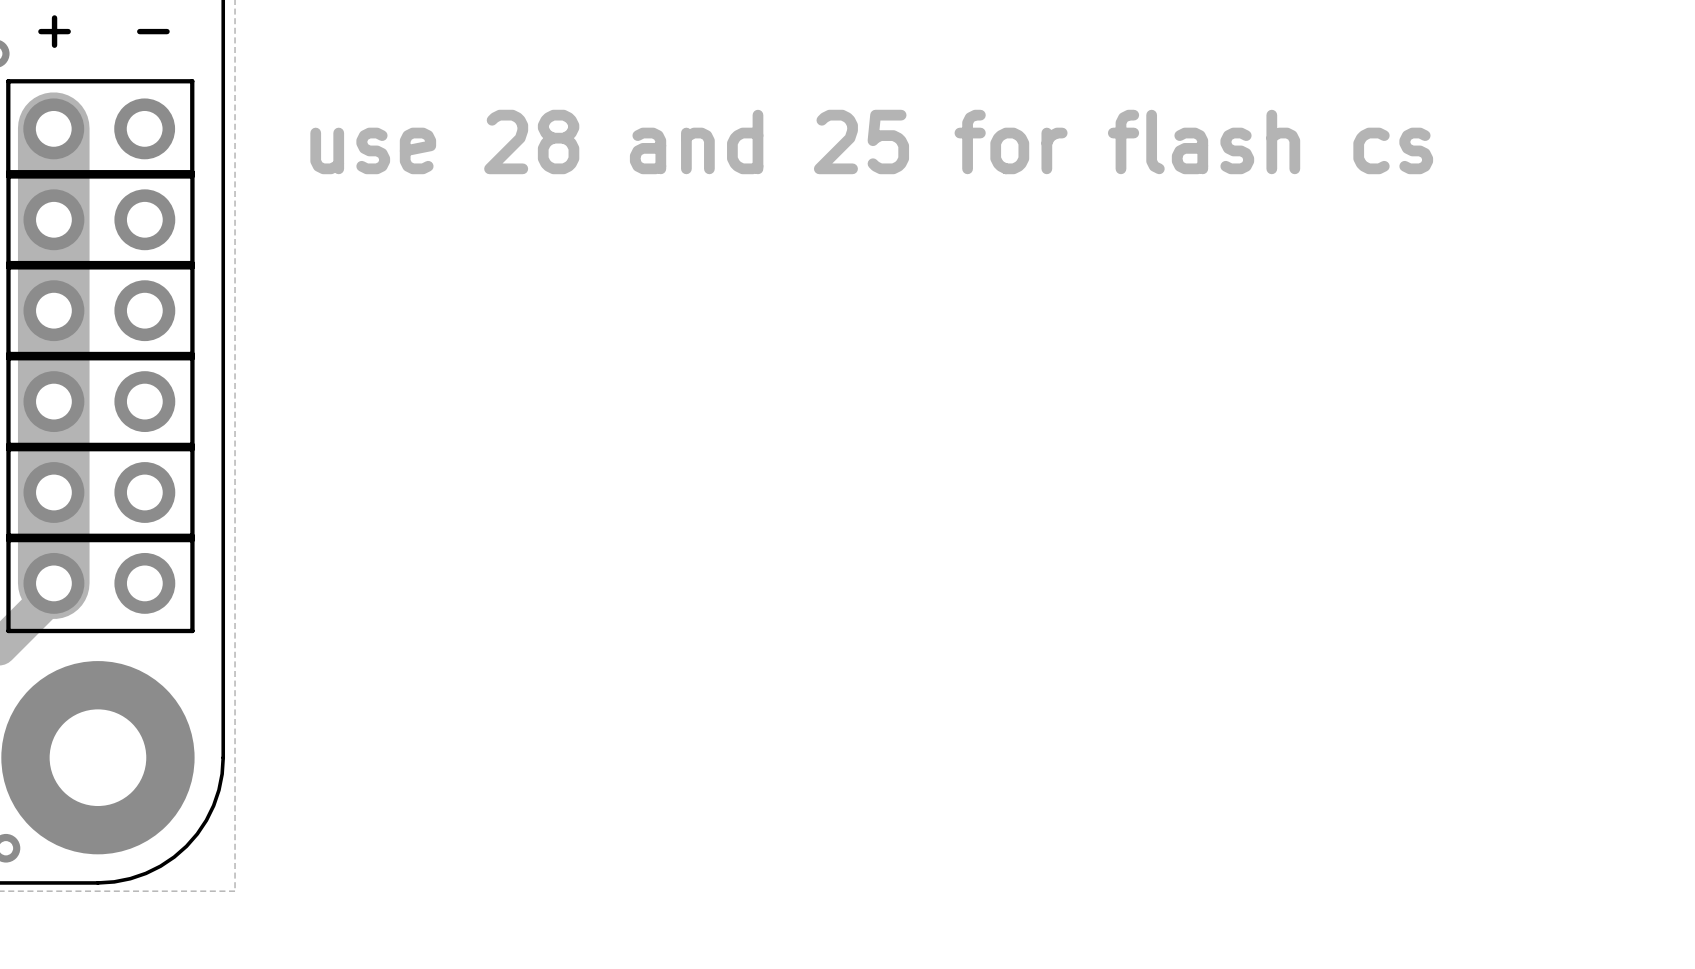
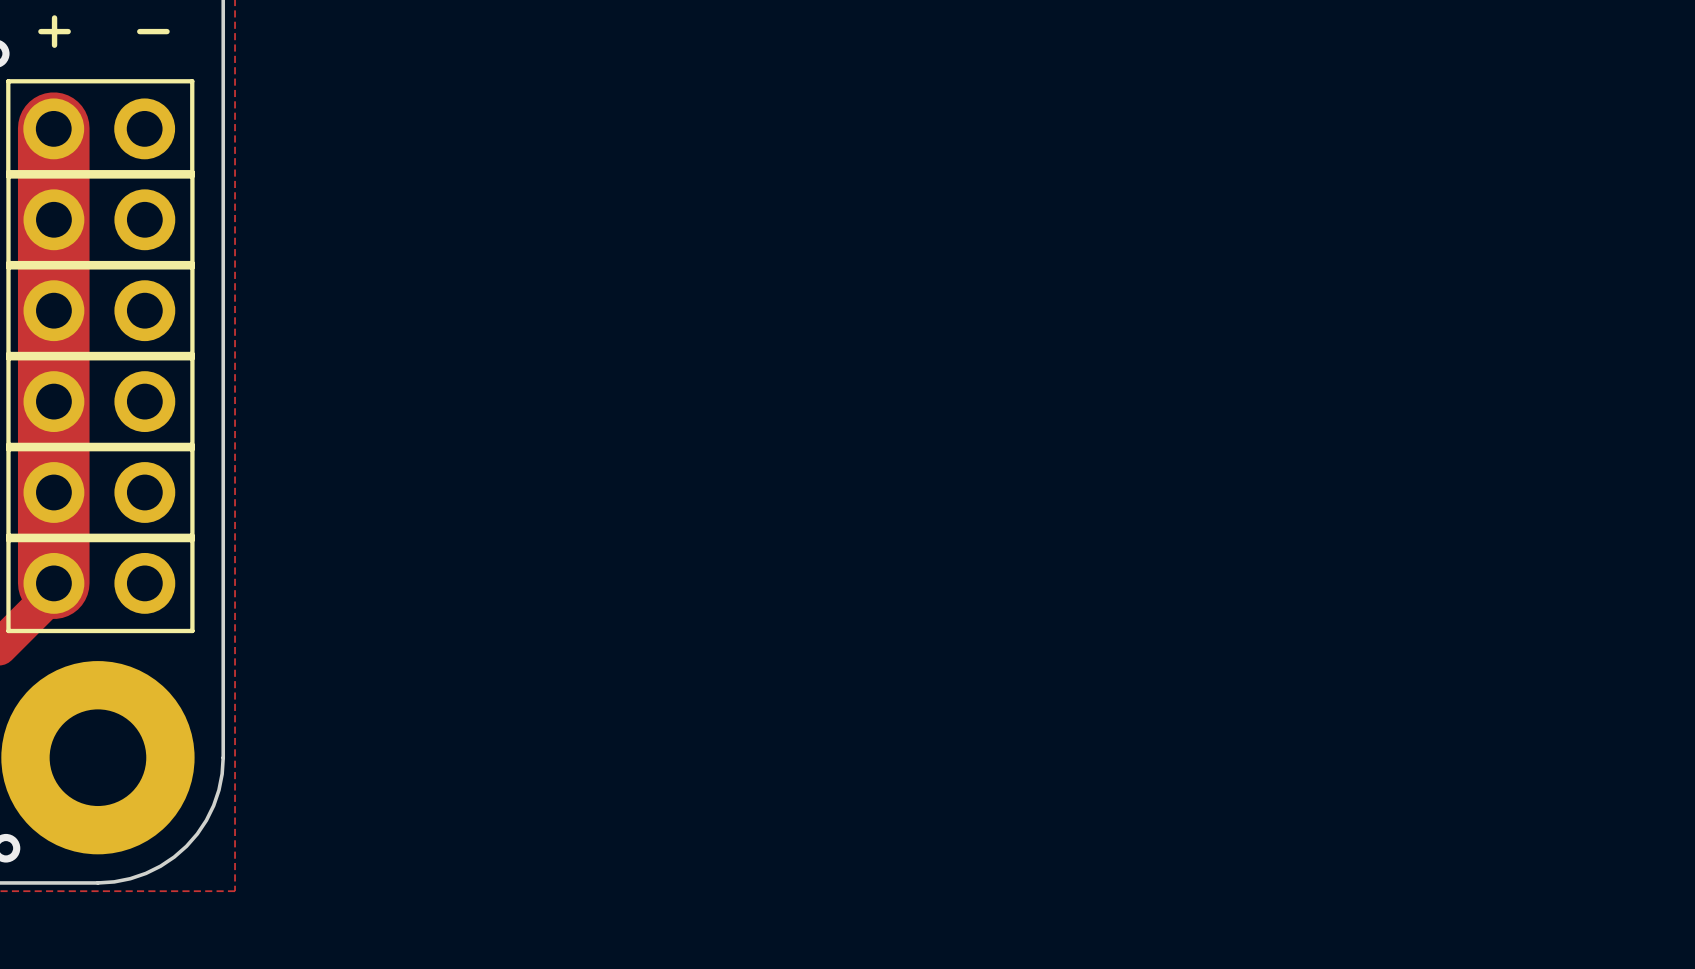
text: use 28 and 25 for flash cs (871, 141) -> none

